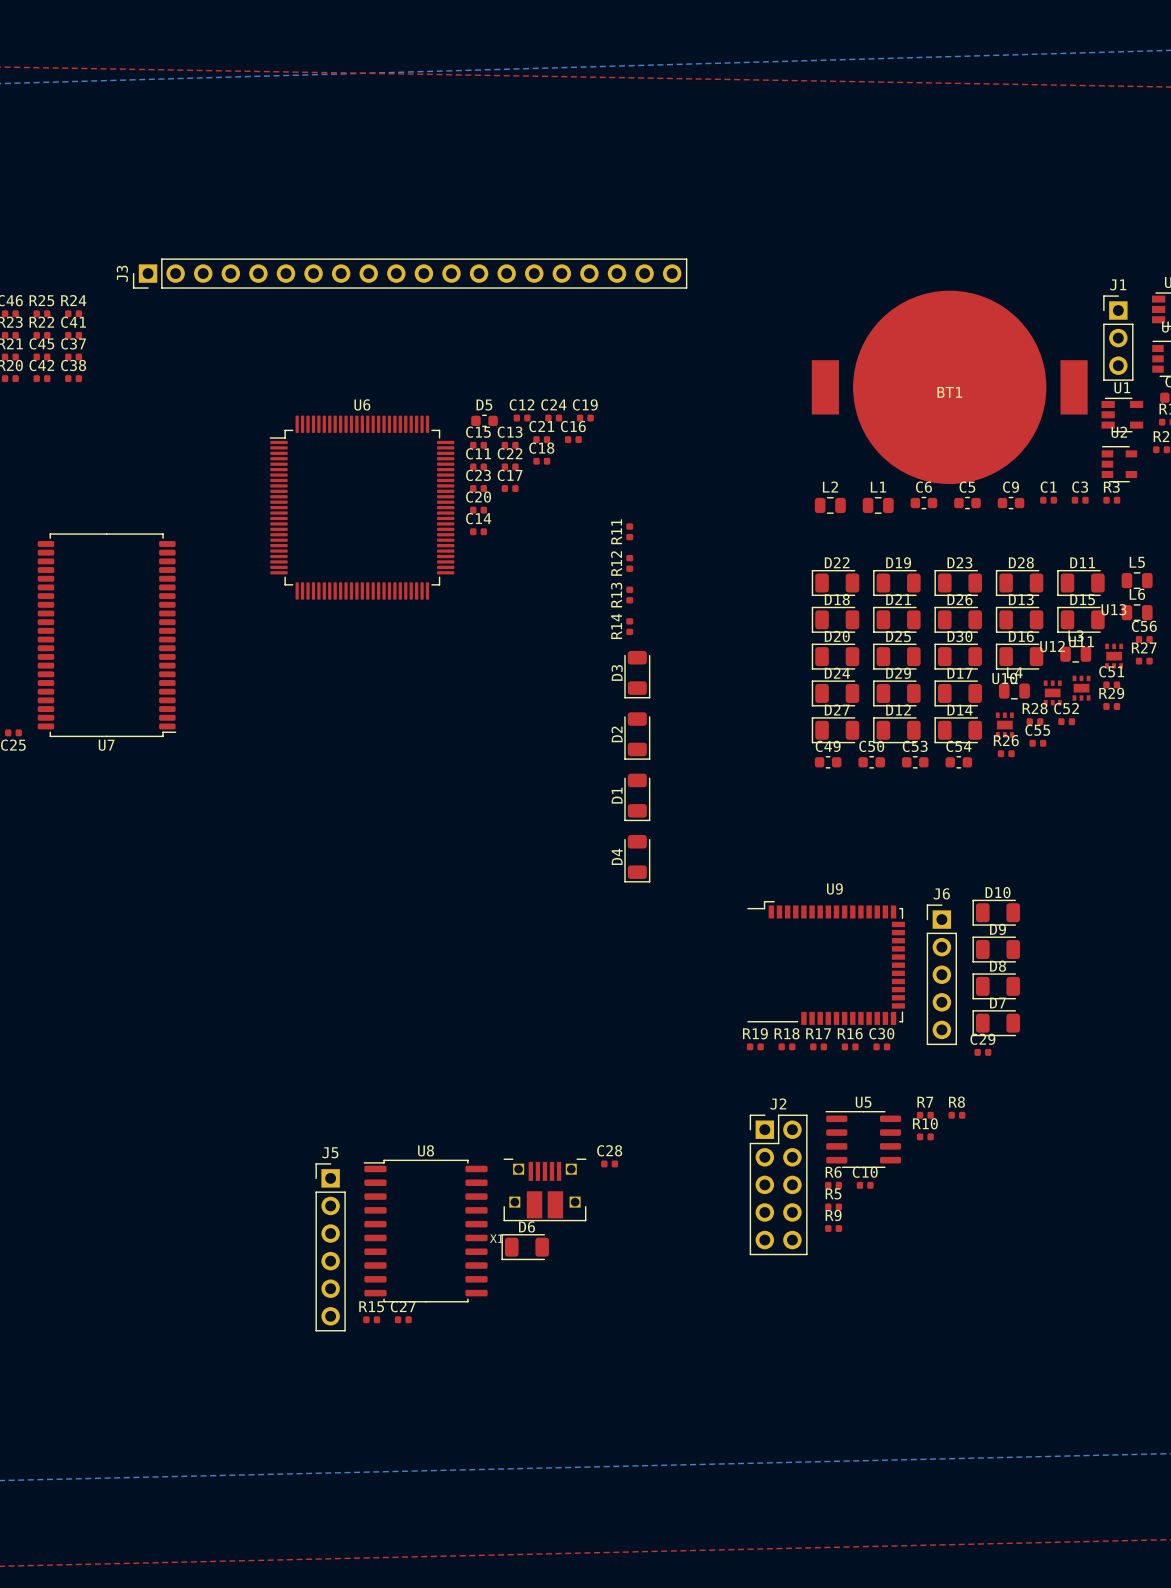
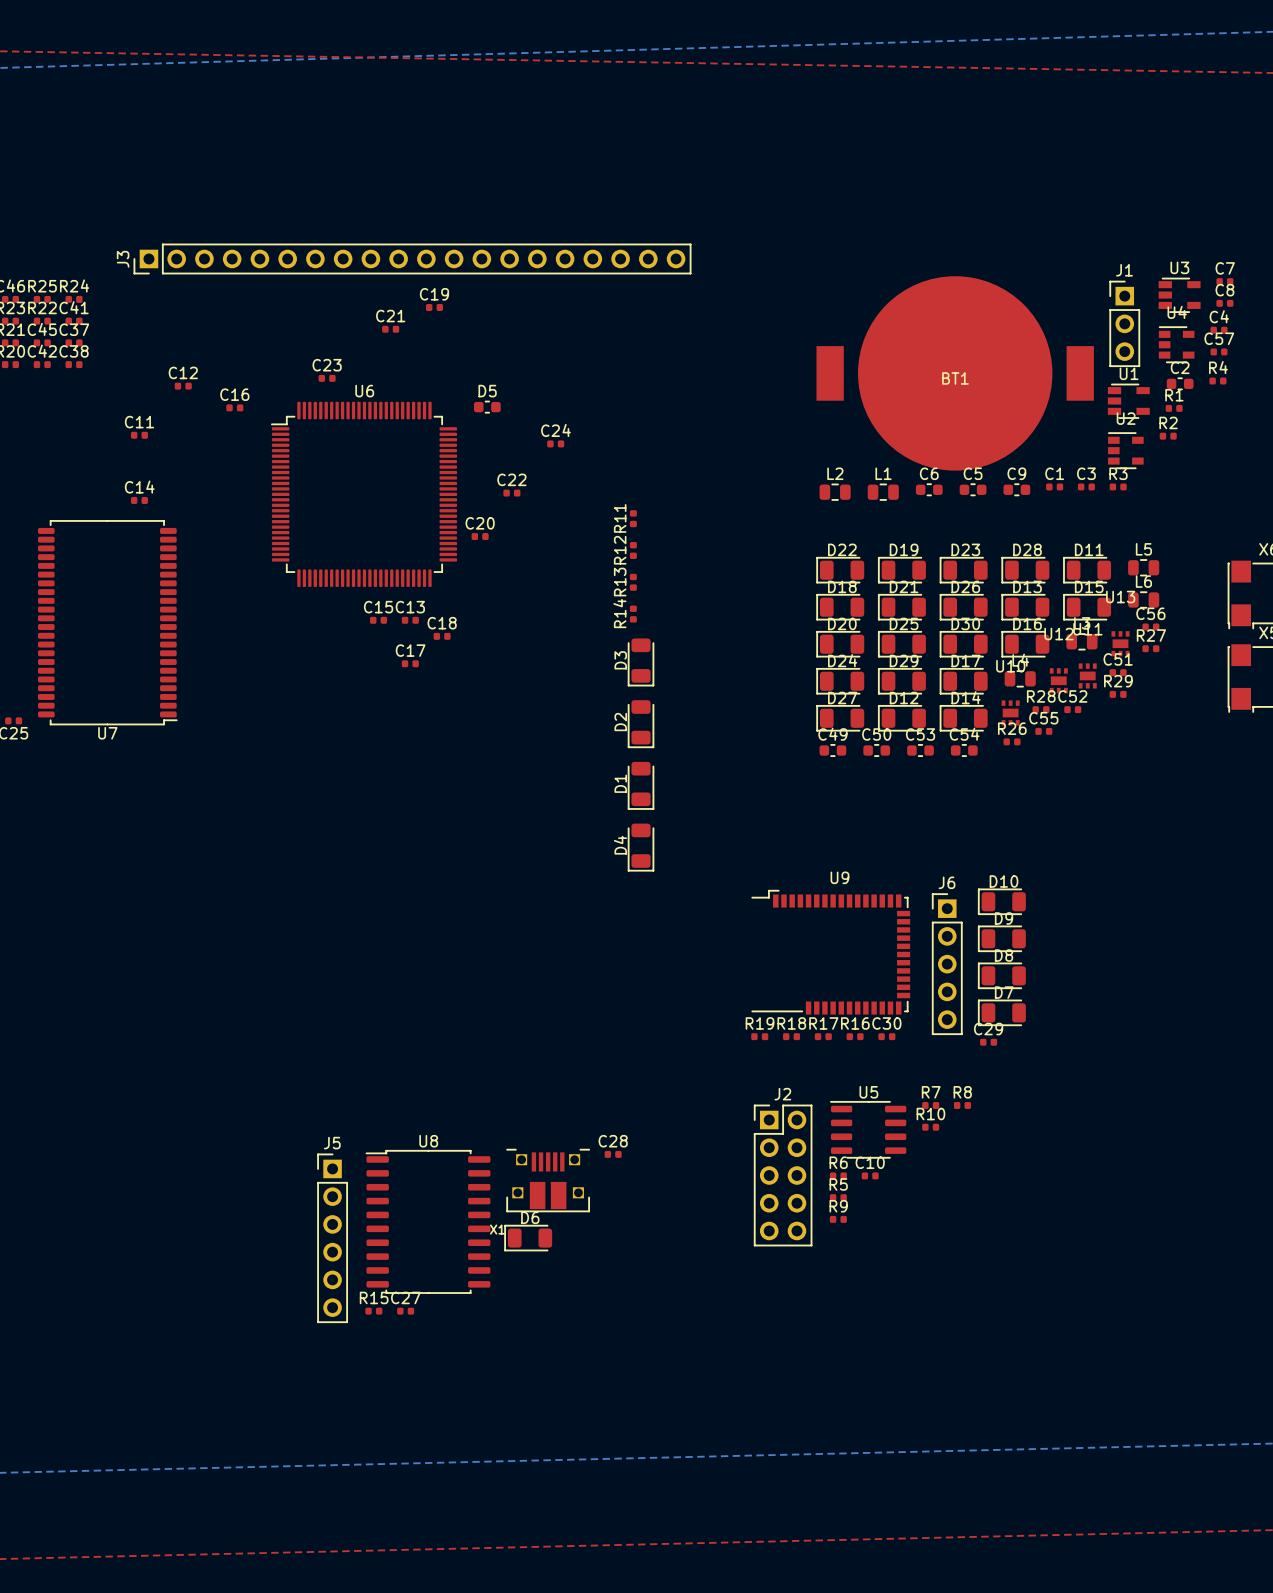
C12 position: (522, 418) -> (183, 386)
C24 position: (553, 418) -> (555, 443)
C19 position: (585, 418) -> (434, 307)
C21 position: (541, 439) -> (390, 329)
C16 position: (573, 439) -> (234, 407)
C15 position: (478, 445) -> (378, 620)
C13 position: (510, 445) -> (410, 620)
C18 position: (541, 461) -> (442, 636)
C11 position: (478, 466) -> (139, 435)
C22 position: (510, 466) -> (511, 493)
C23 position: (478, 488) -> (327, 378)
C17 position: (510, 488) -> (410, 663)
C20 position: (478, 510) -> (480, 536)
C14 position: (478, 531) -> (139, 500)

